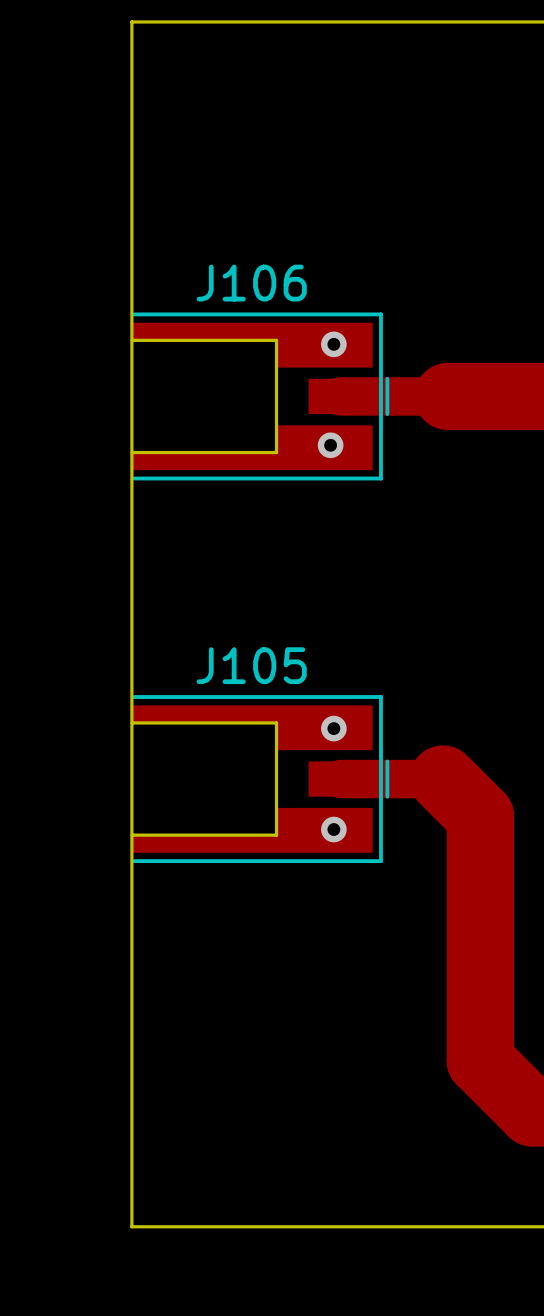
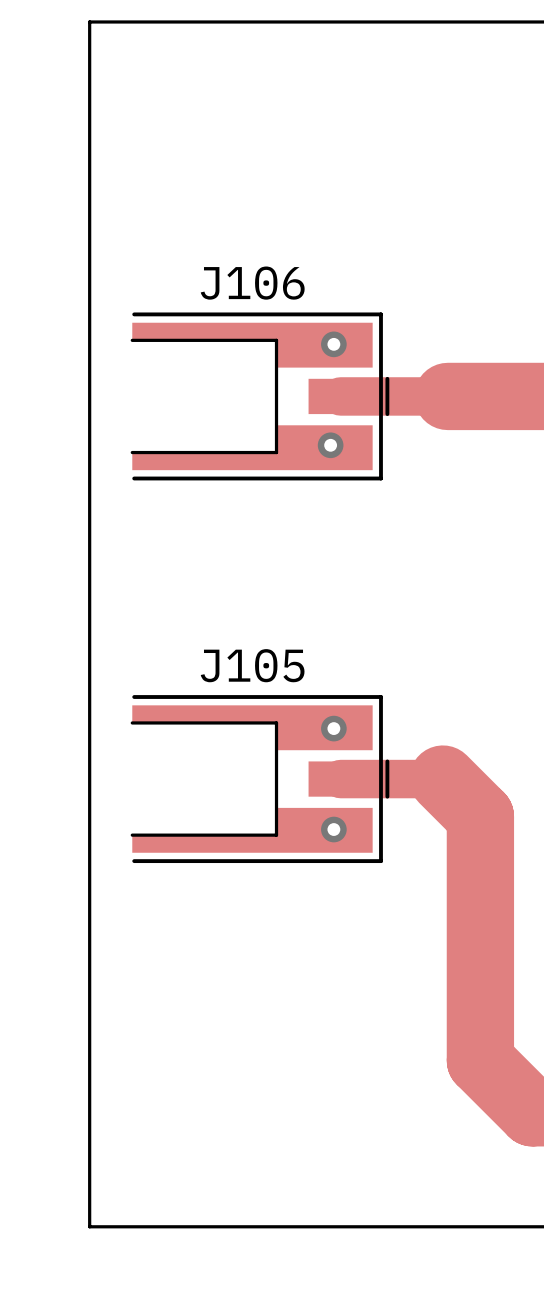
board edge: (131, 21) (131, 1226) -> (131, 21) (89, 21) (89, 1226) (131, 1226)

